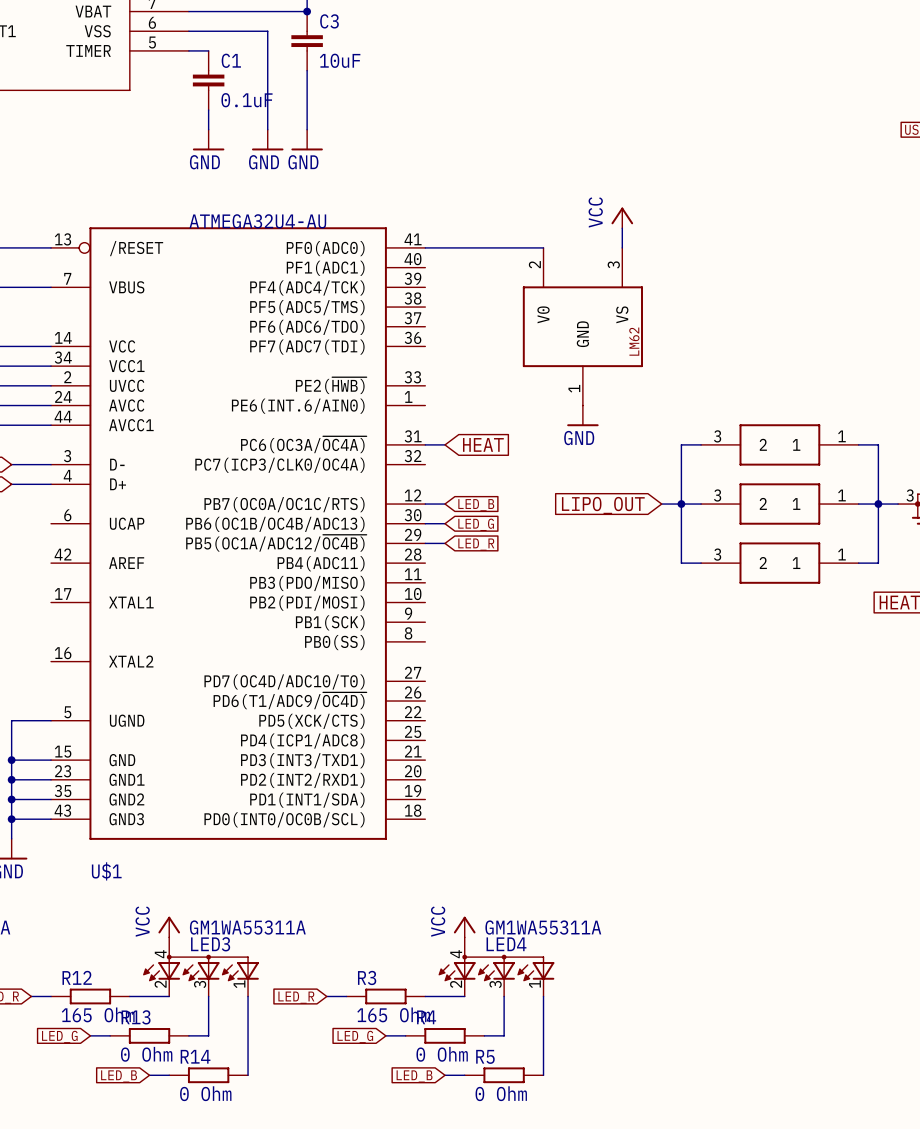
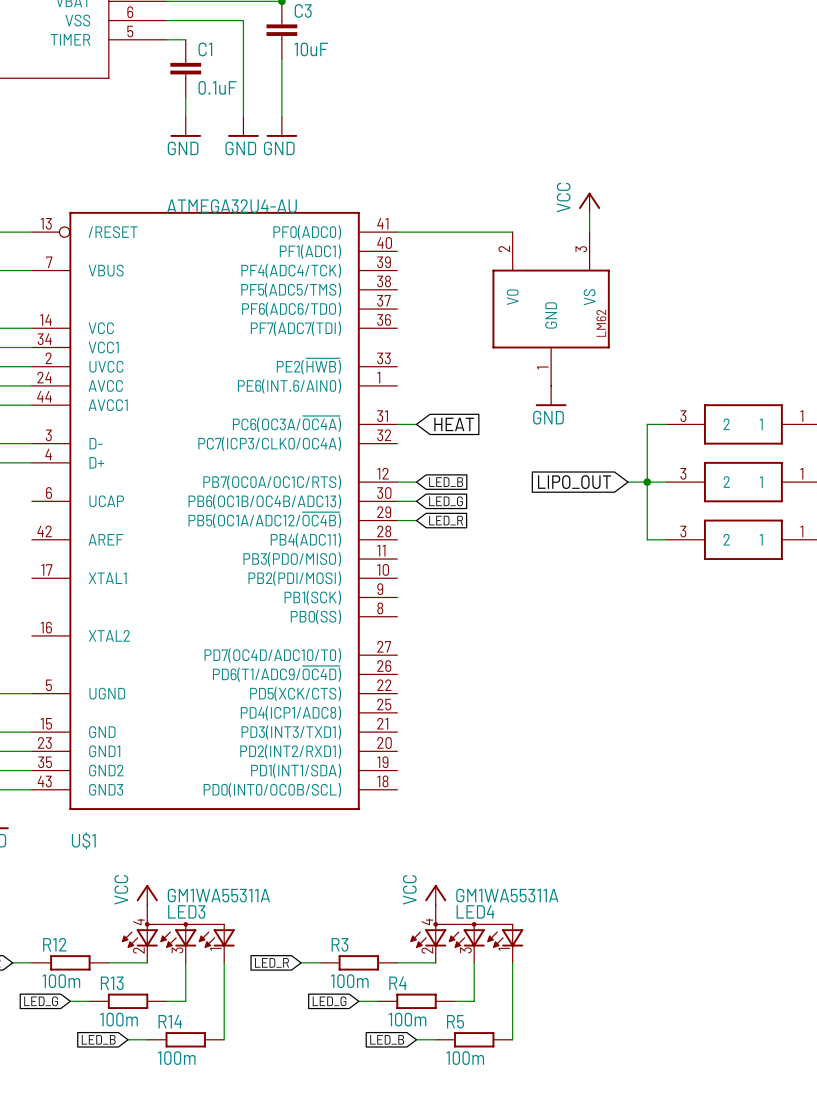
R12 value: 165 Ohm (98, 1014) -> 100m (61, 981)
R3 value: 165 Ohm (393, 1014) -> 100m (349, 981)
R13 value: 0 Ohm (146, 1054) -> 100m (119, 1019)
R4 value: 0 Ohm (442, 1054) -> 100m (407, 1019)
R14 value: 0 Ohm (205, 1093) -> 100m (176, 1058)
R5 value: 0 Ohm (501, 1093) -> 100m (465, 1058)

